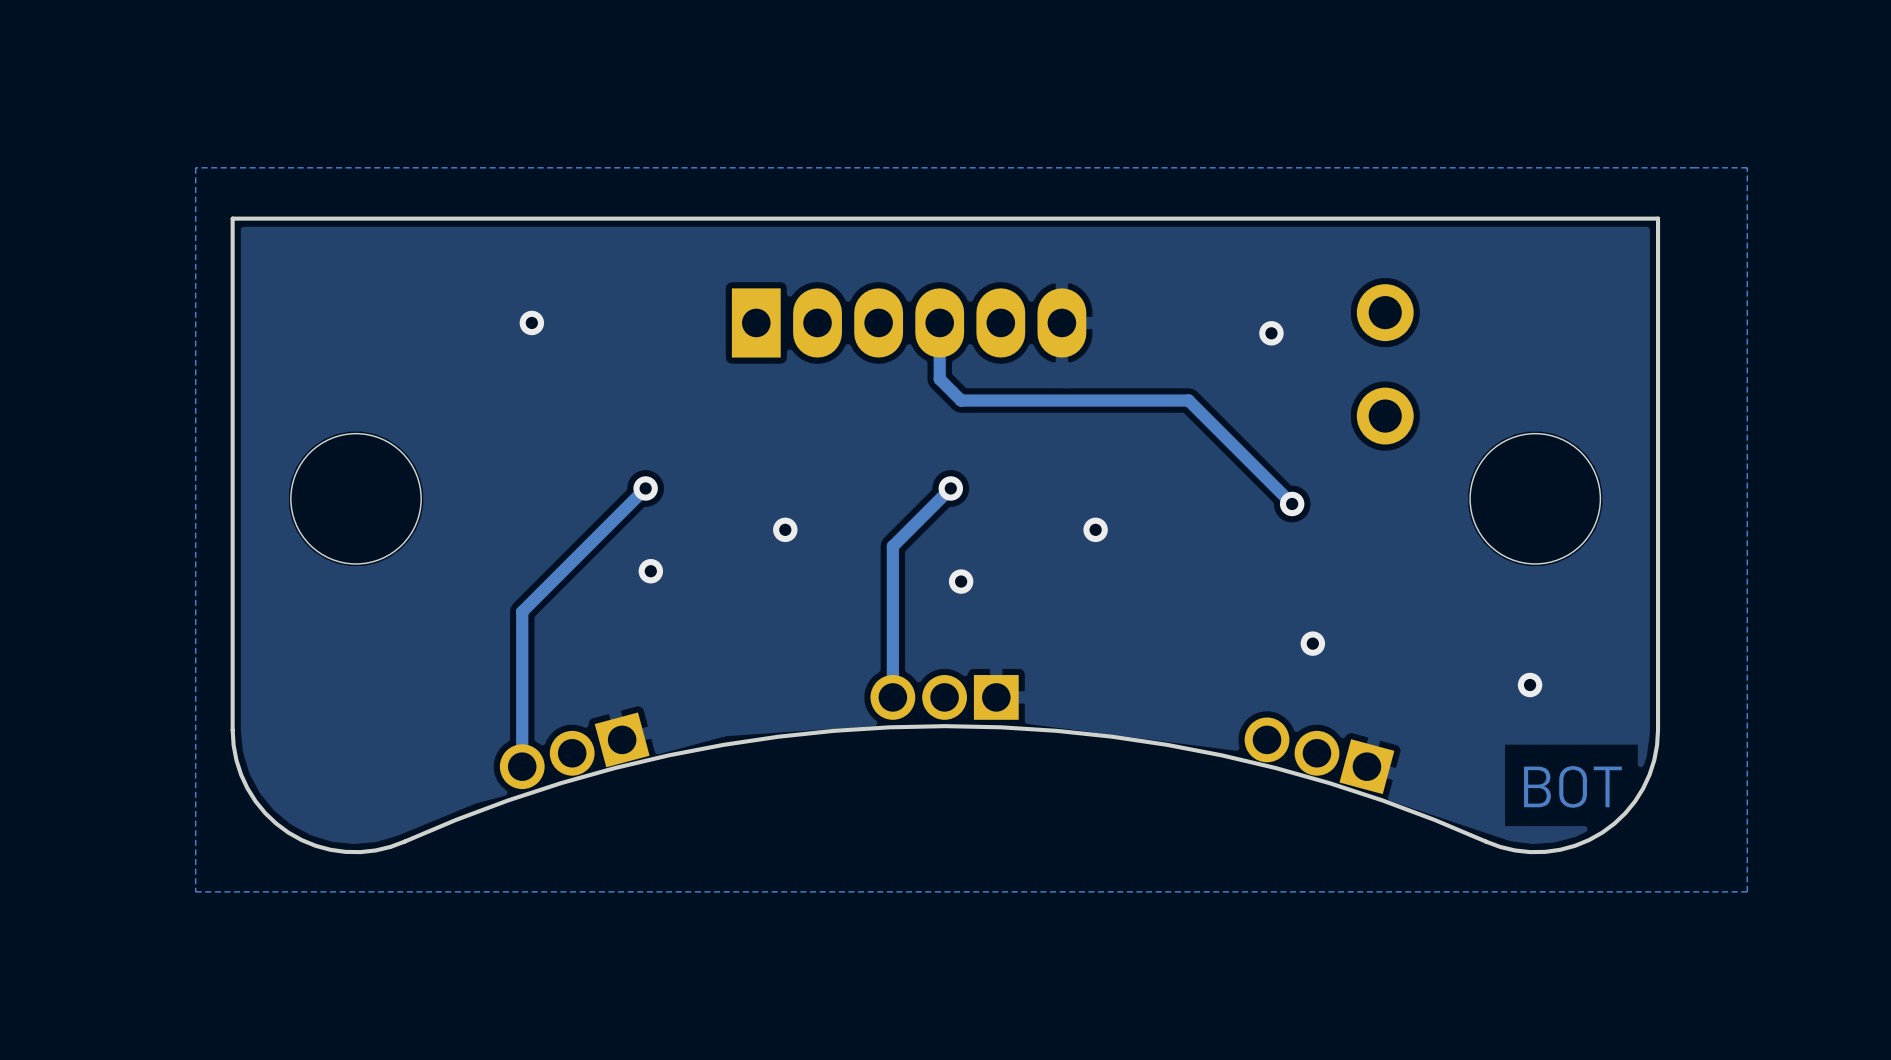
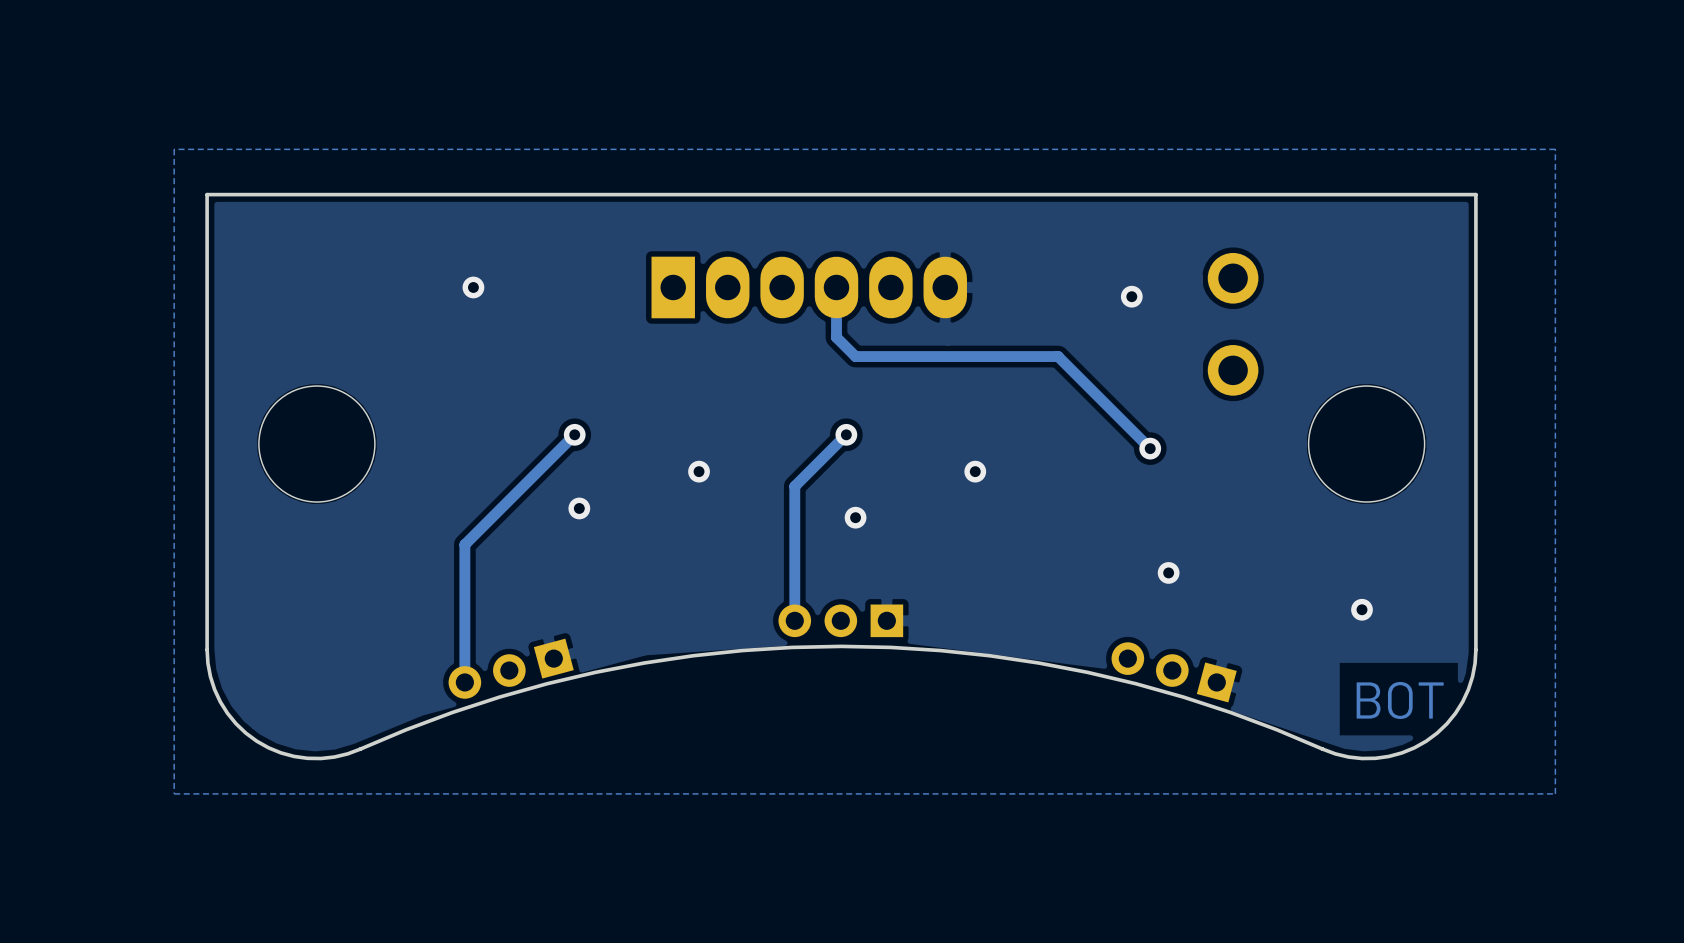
part footprint: [870, 675, 1019, 720] -> [778, 604, 904, 638]
part footprint: [499, 712, 650, 790] -> [448, 638, 574, 699]
part footprint: [1244, 717, 1395, 795] -> [1111, 642, 1237, 703]

